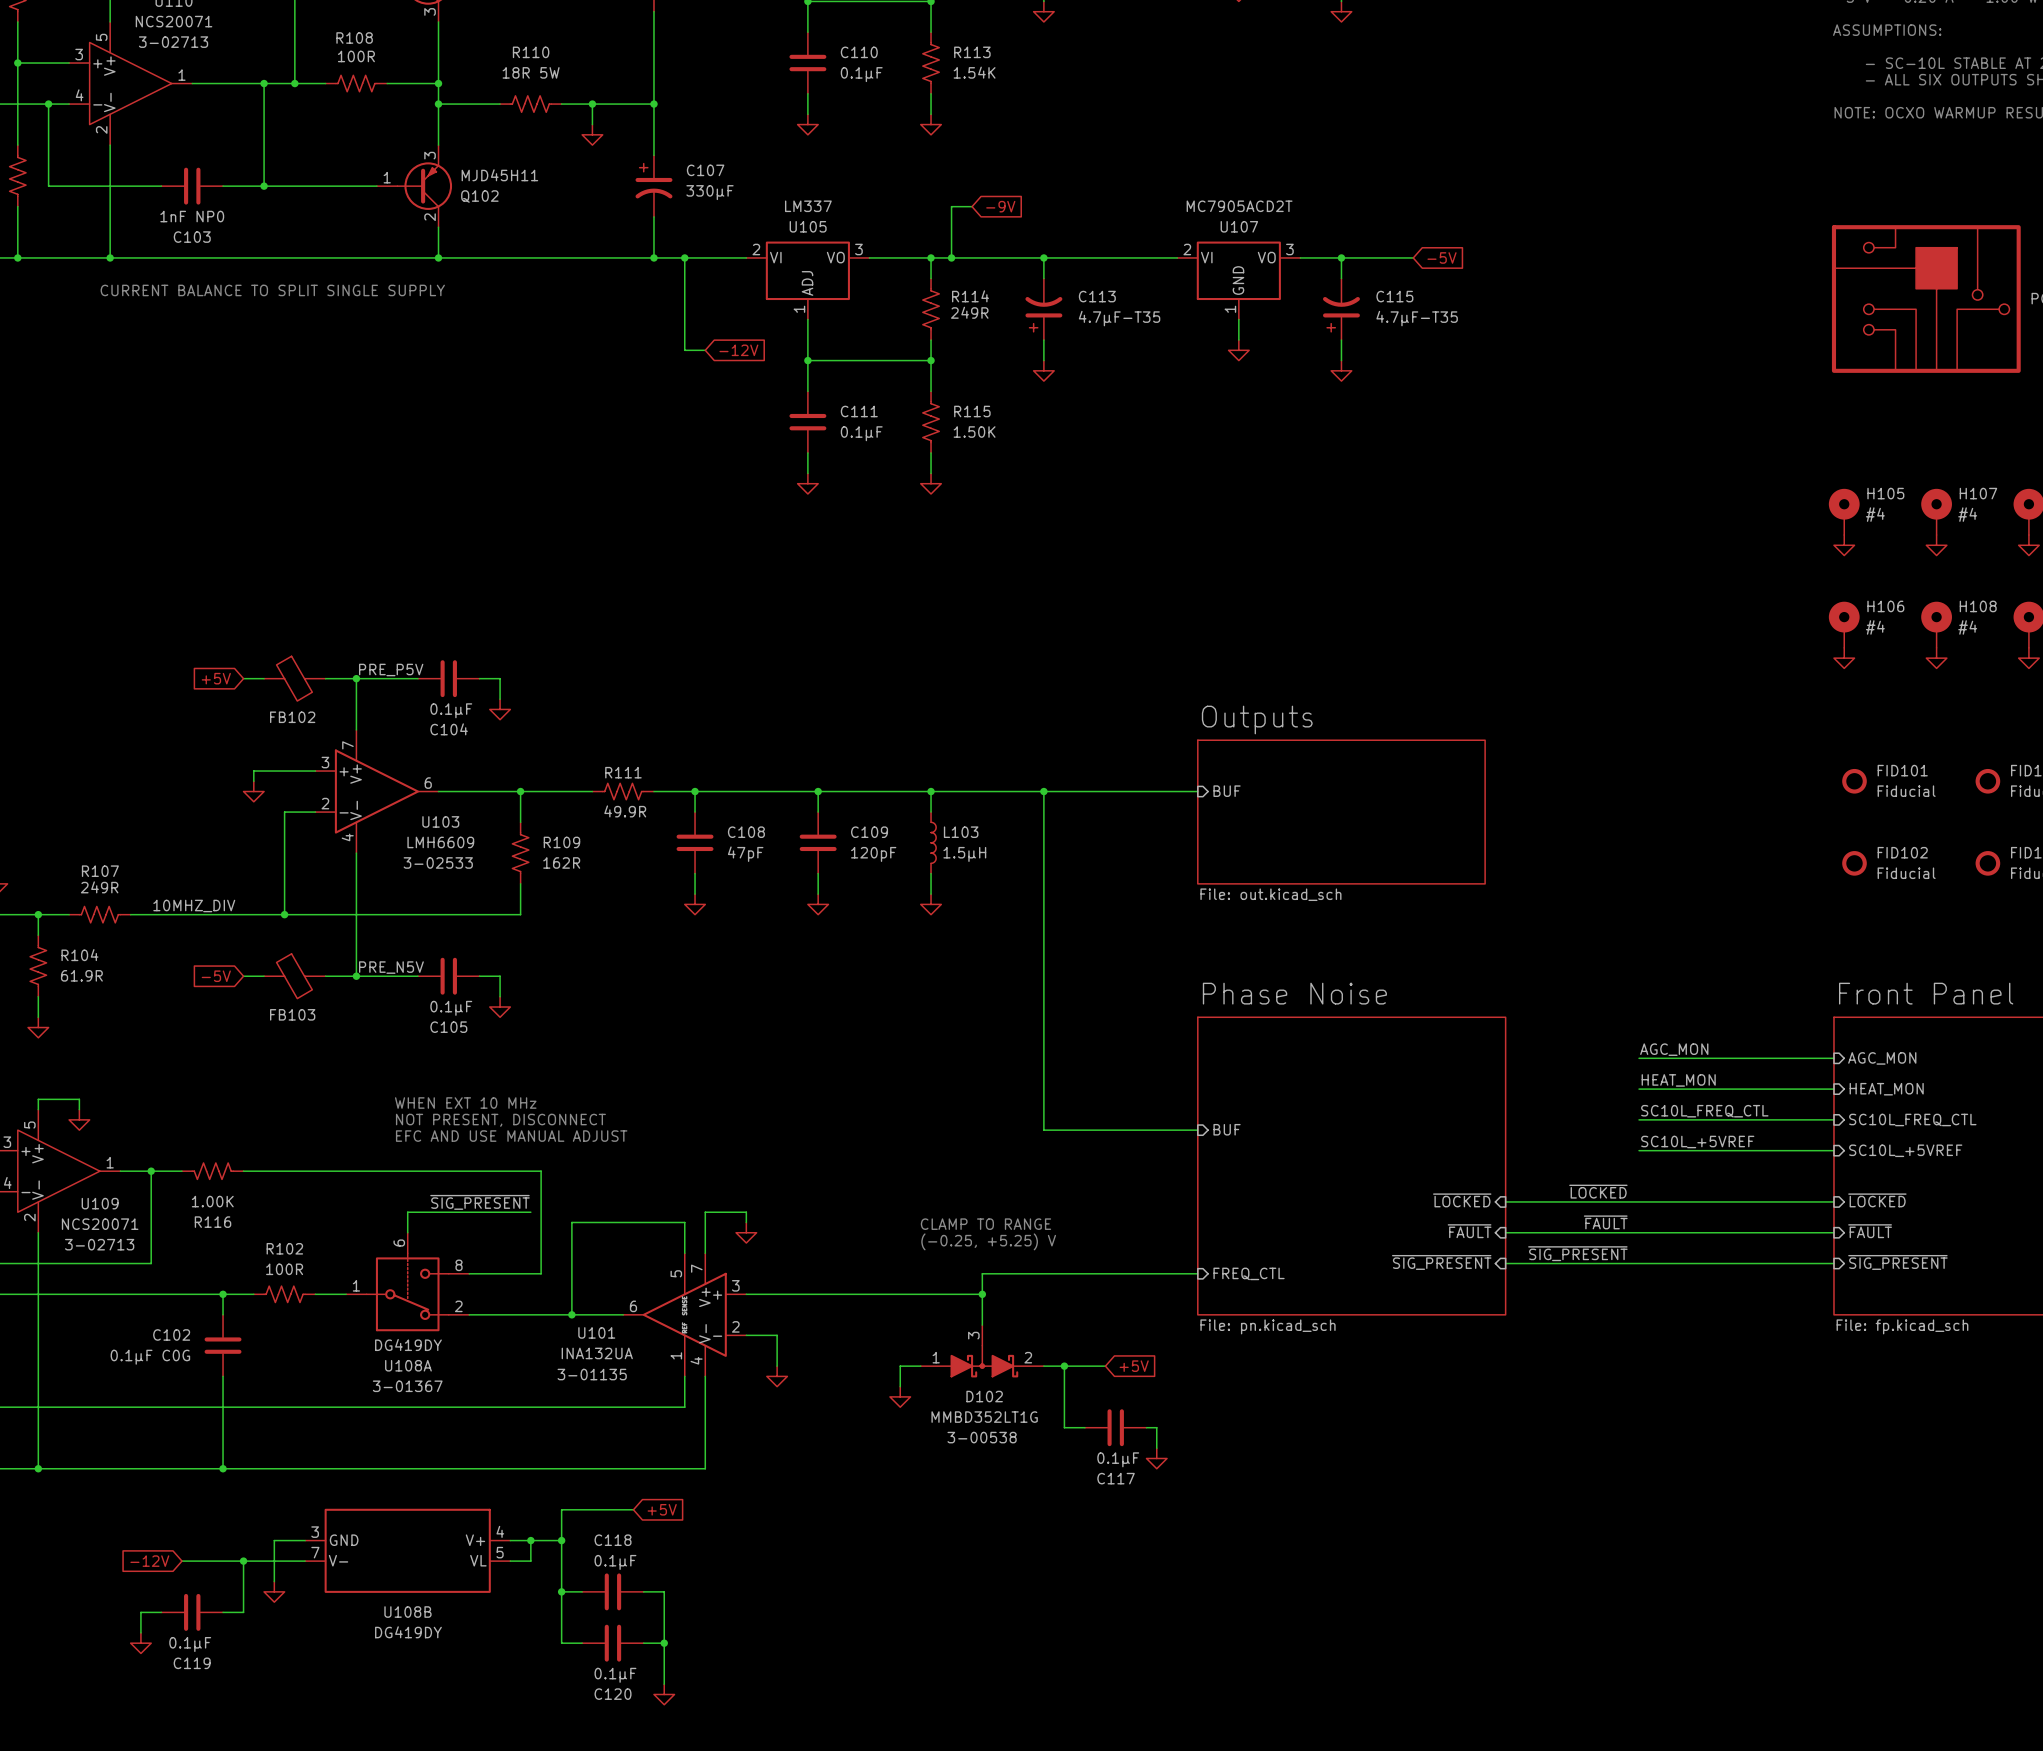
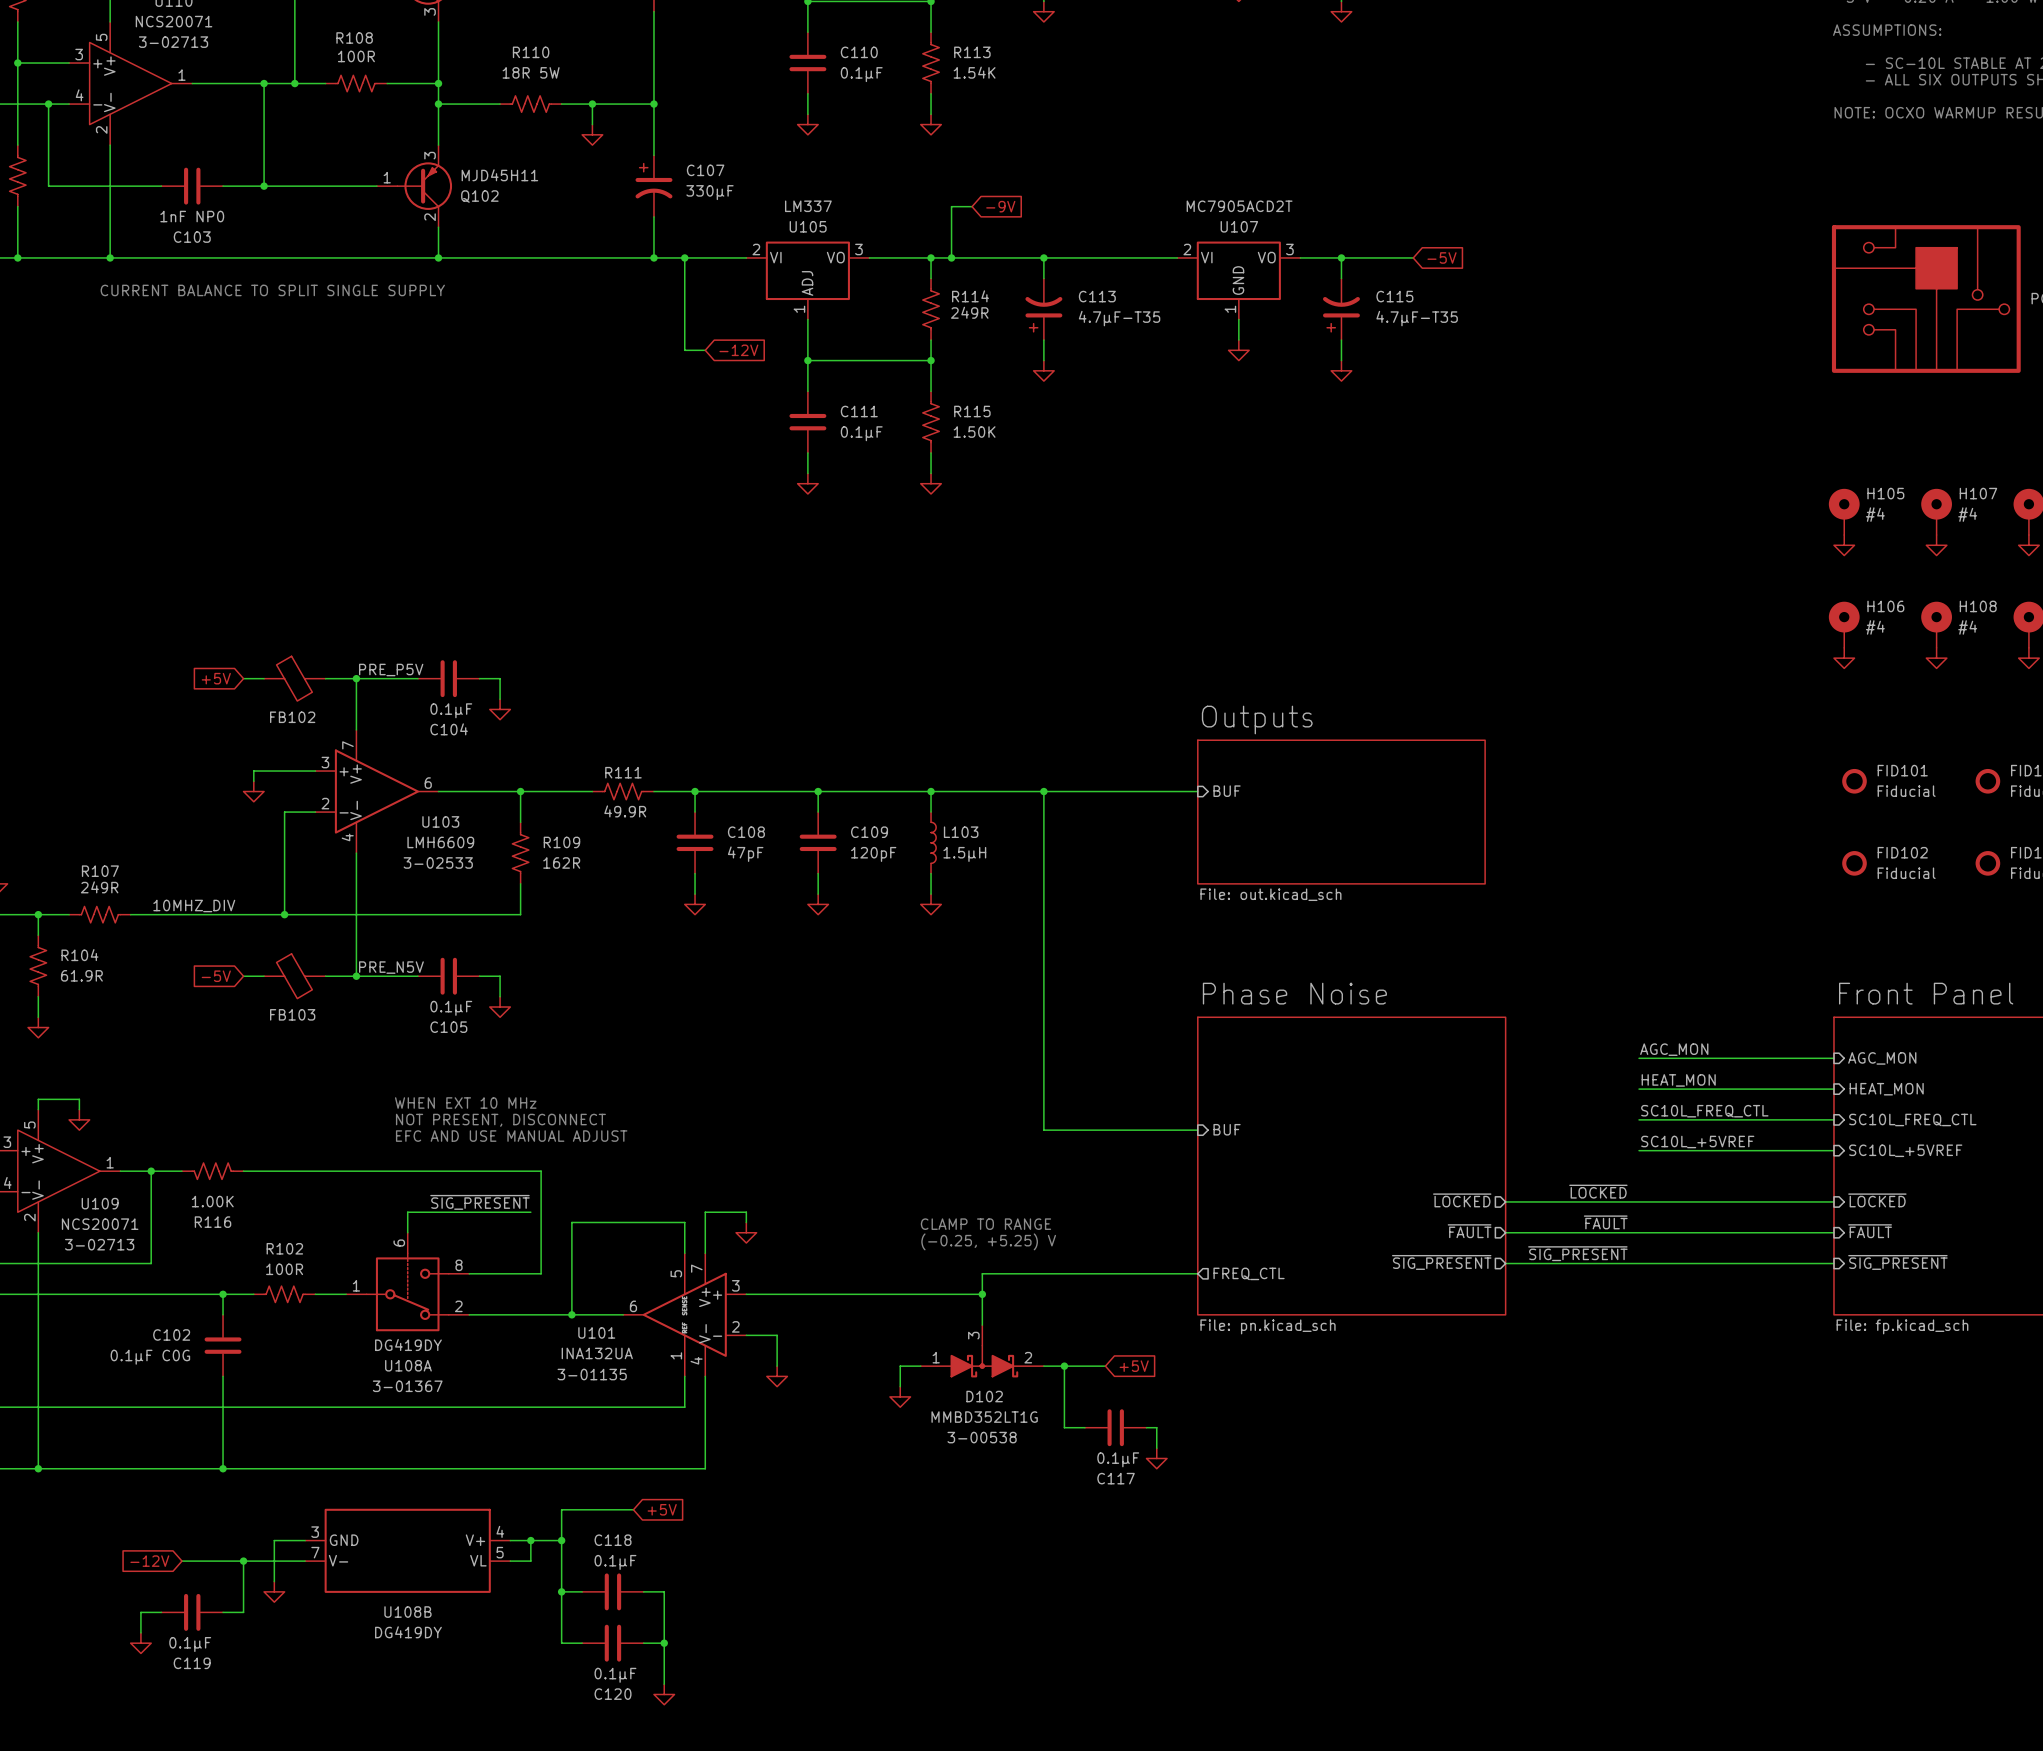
sheet pin shape: input (1462, 1200) -> output (1462, 1200)
sheet pin shape: input (1469, 1231) -> output (1469, 1231)
sheet pin shape: input (1441, 1262) -> output (1441, 1262)
sheet pin shape: input (1249, 1273) -> output (1249, 1273)

